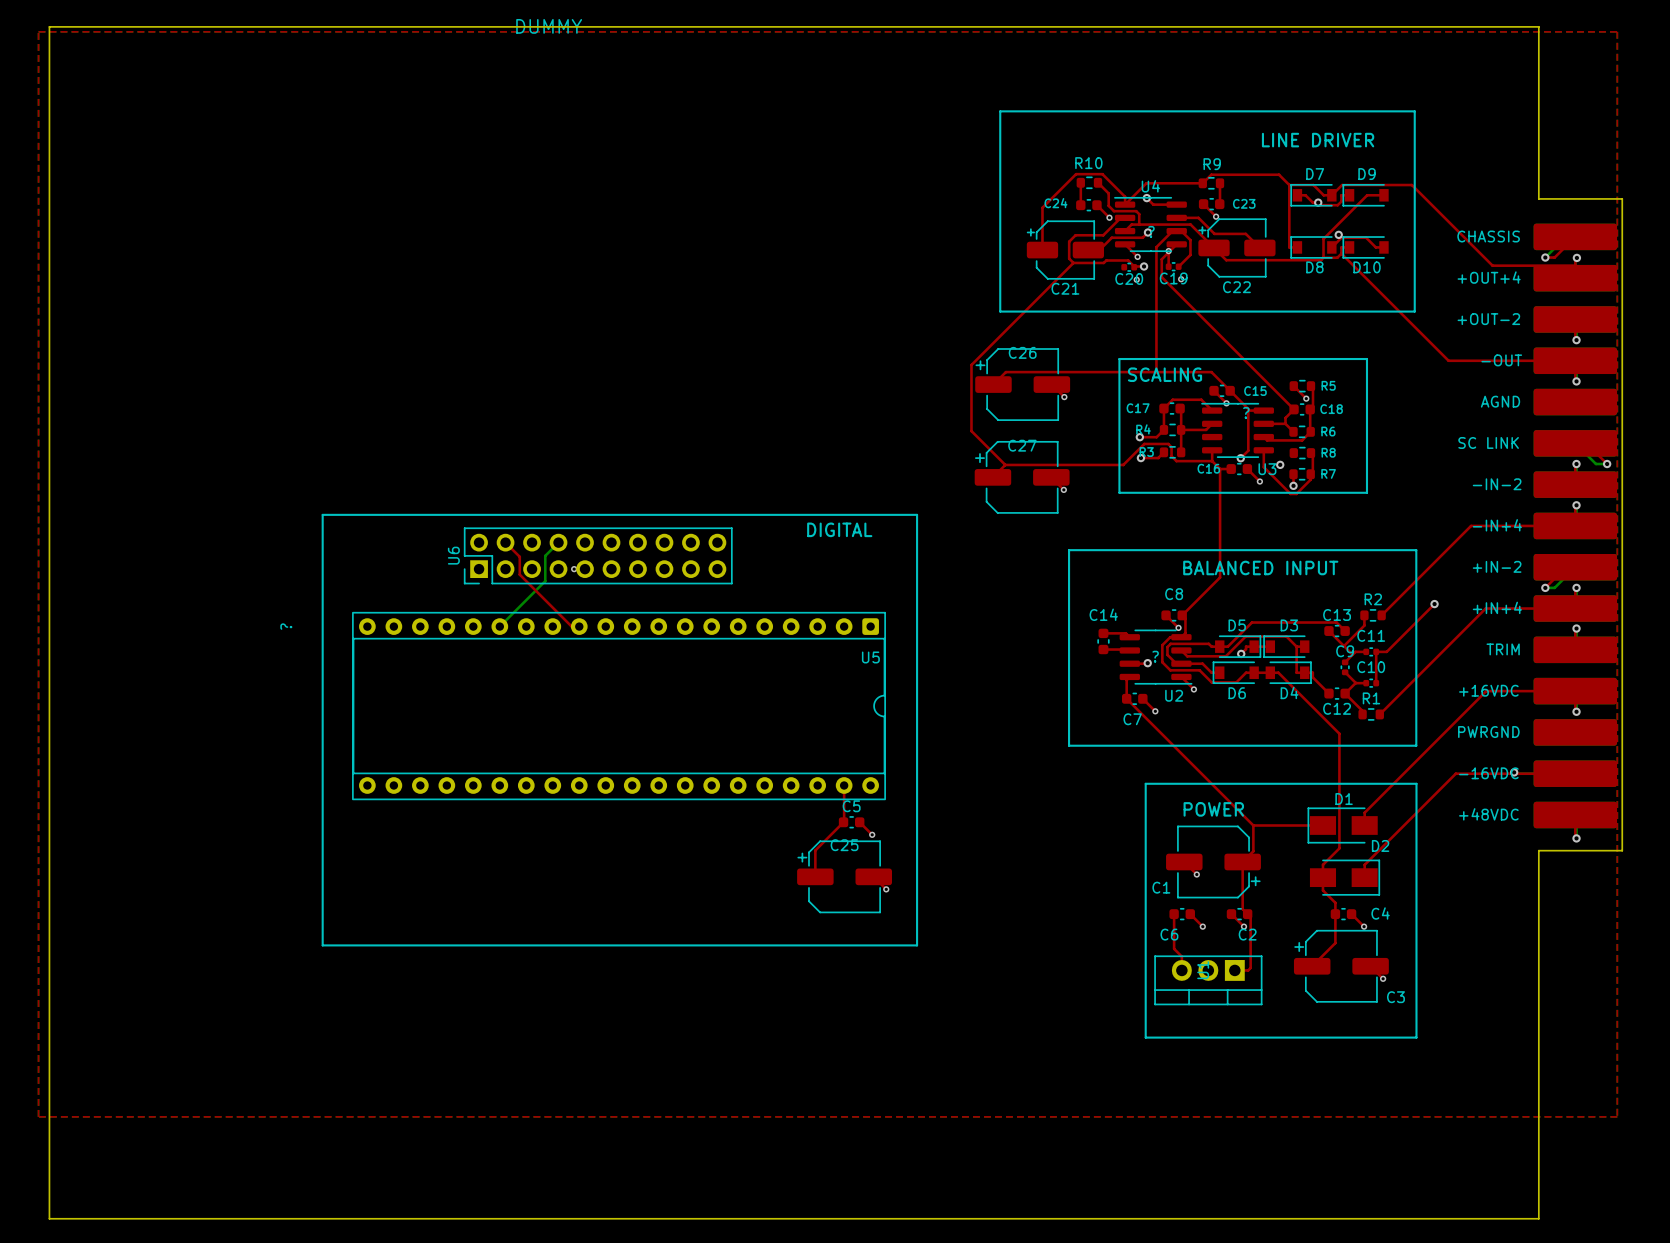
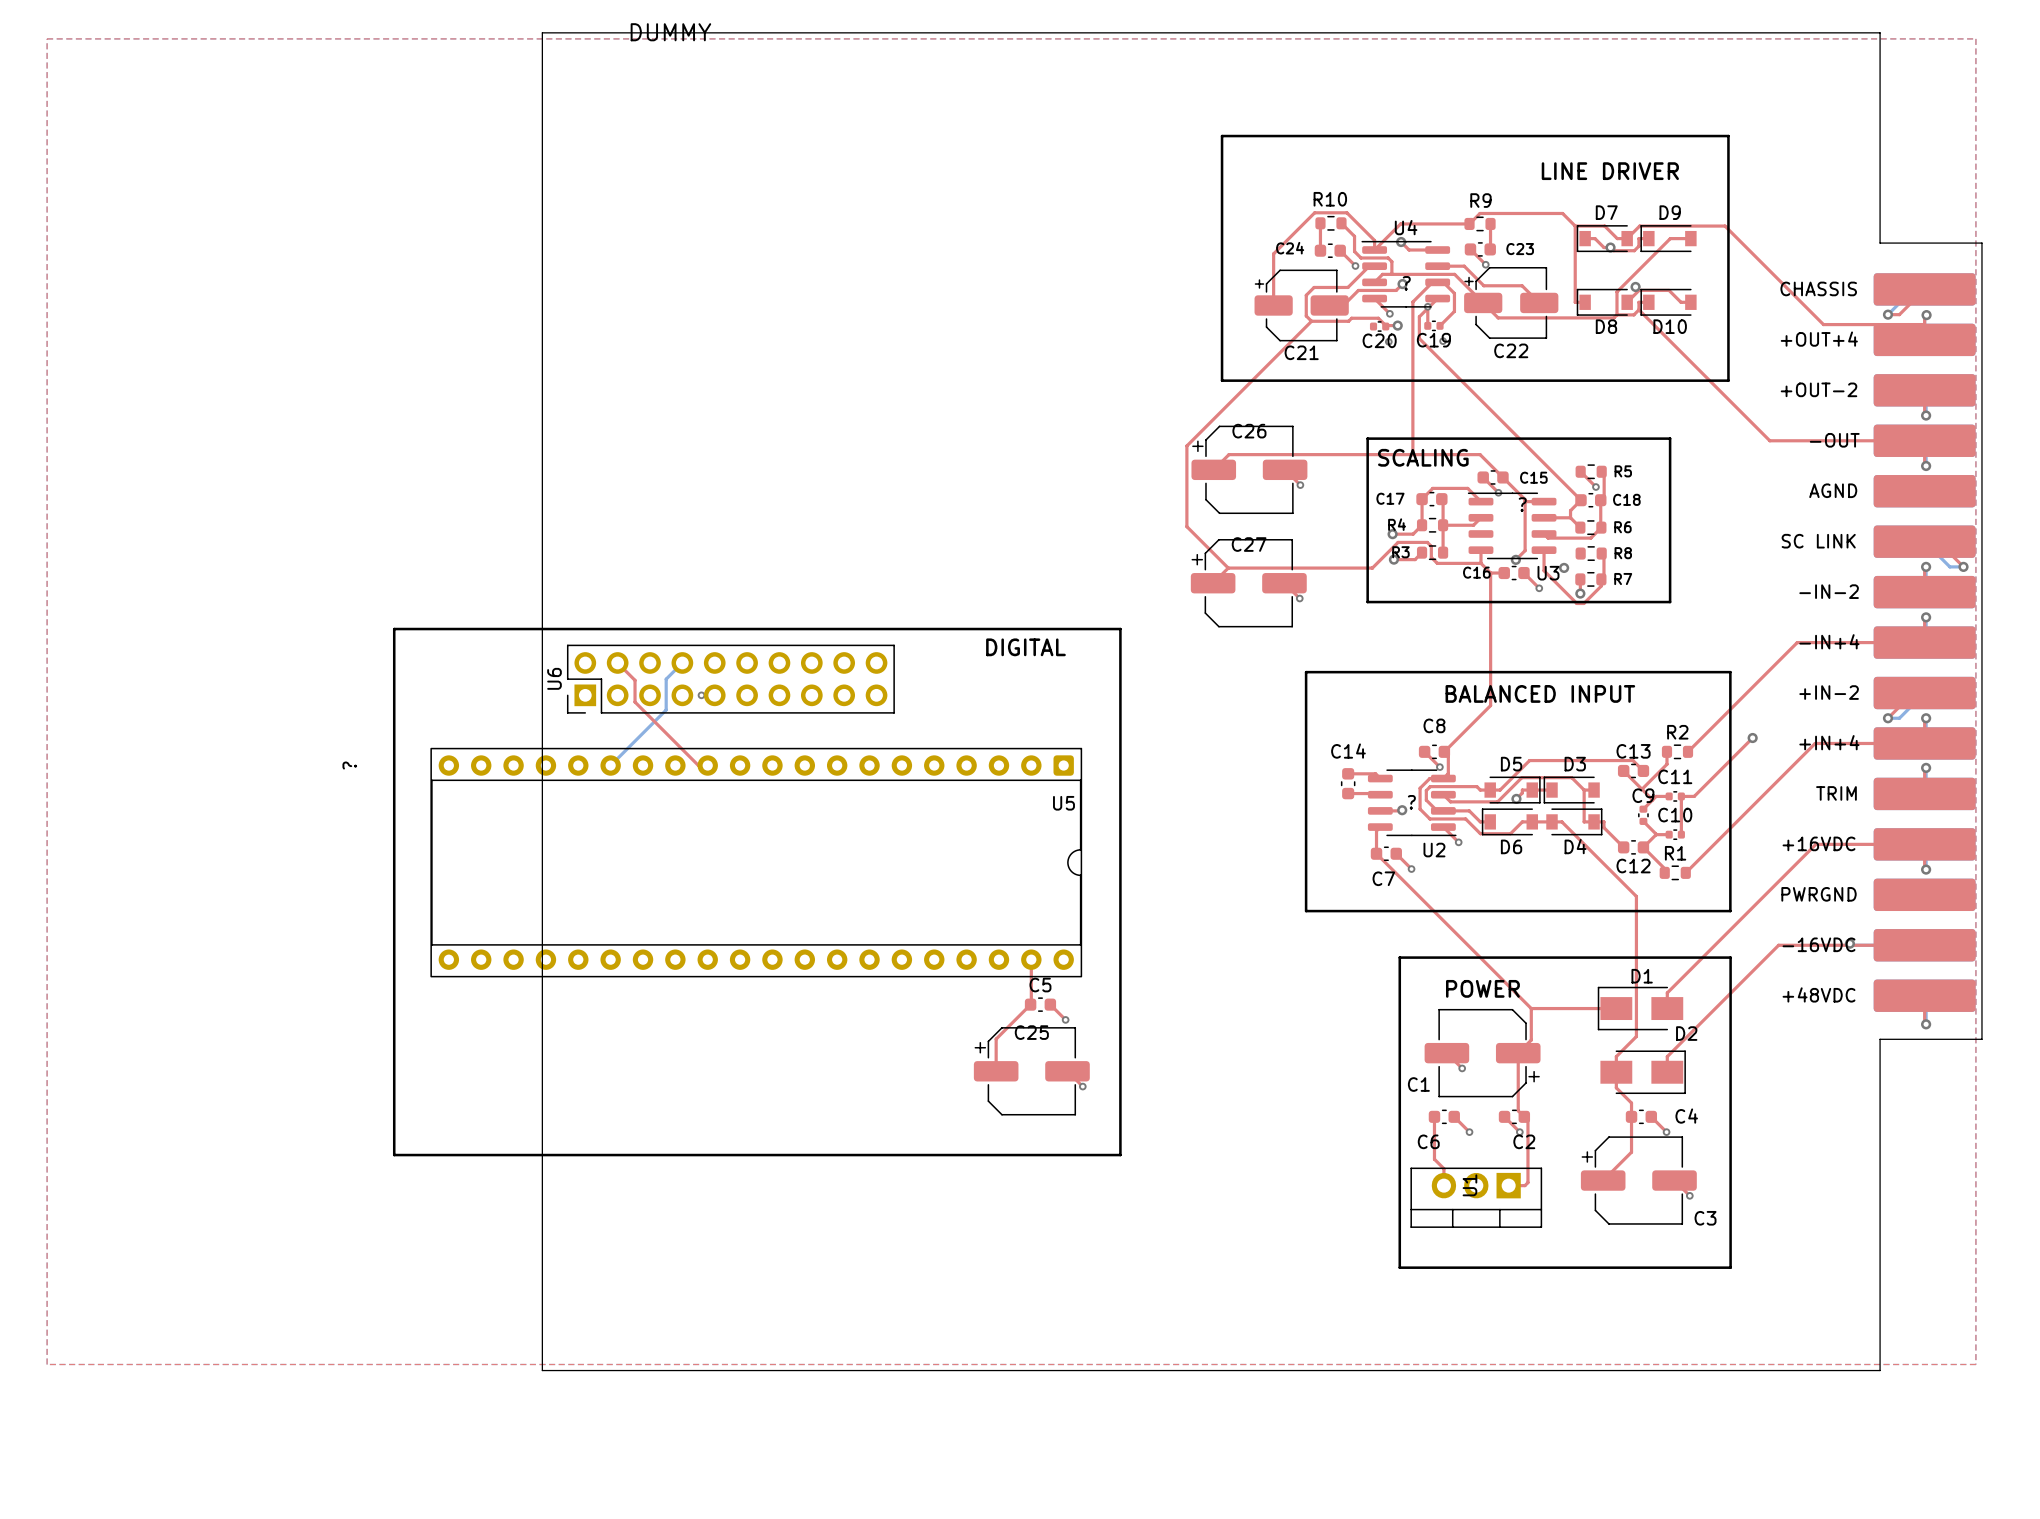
board edge: (443, 26) (49, 26) (49, 1218) (1538, 1218) (1538, 1121) -> (542, 32) (542, 1370) (1880, 1370)

